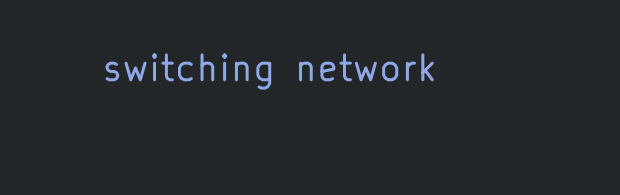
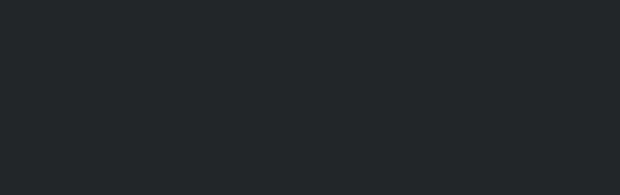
text: switching network (269, 71) -> none

